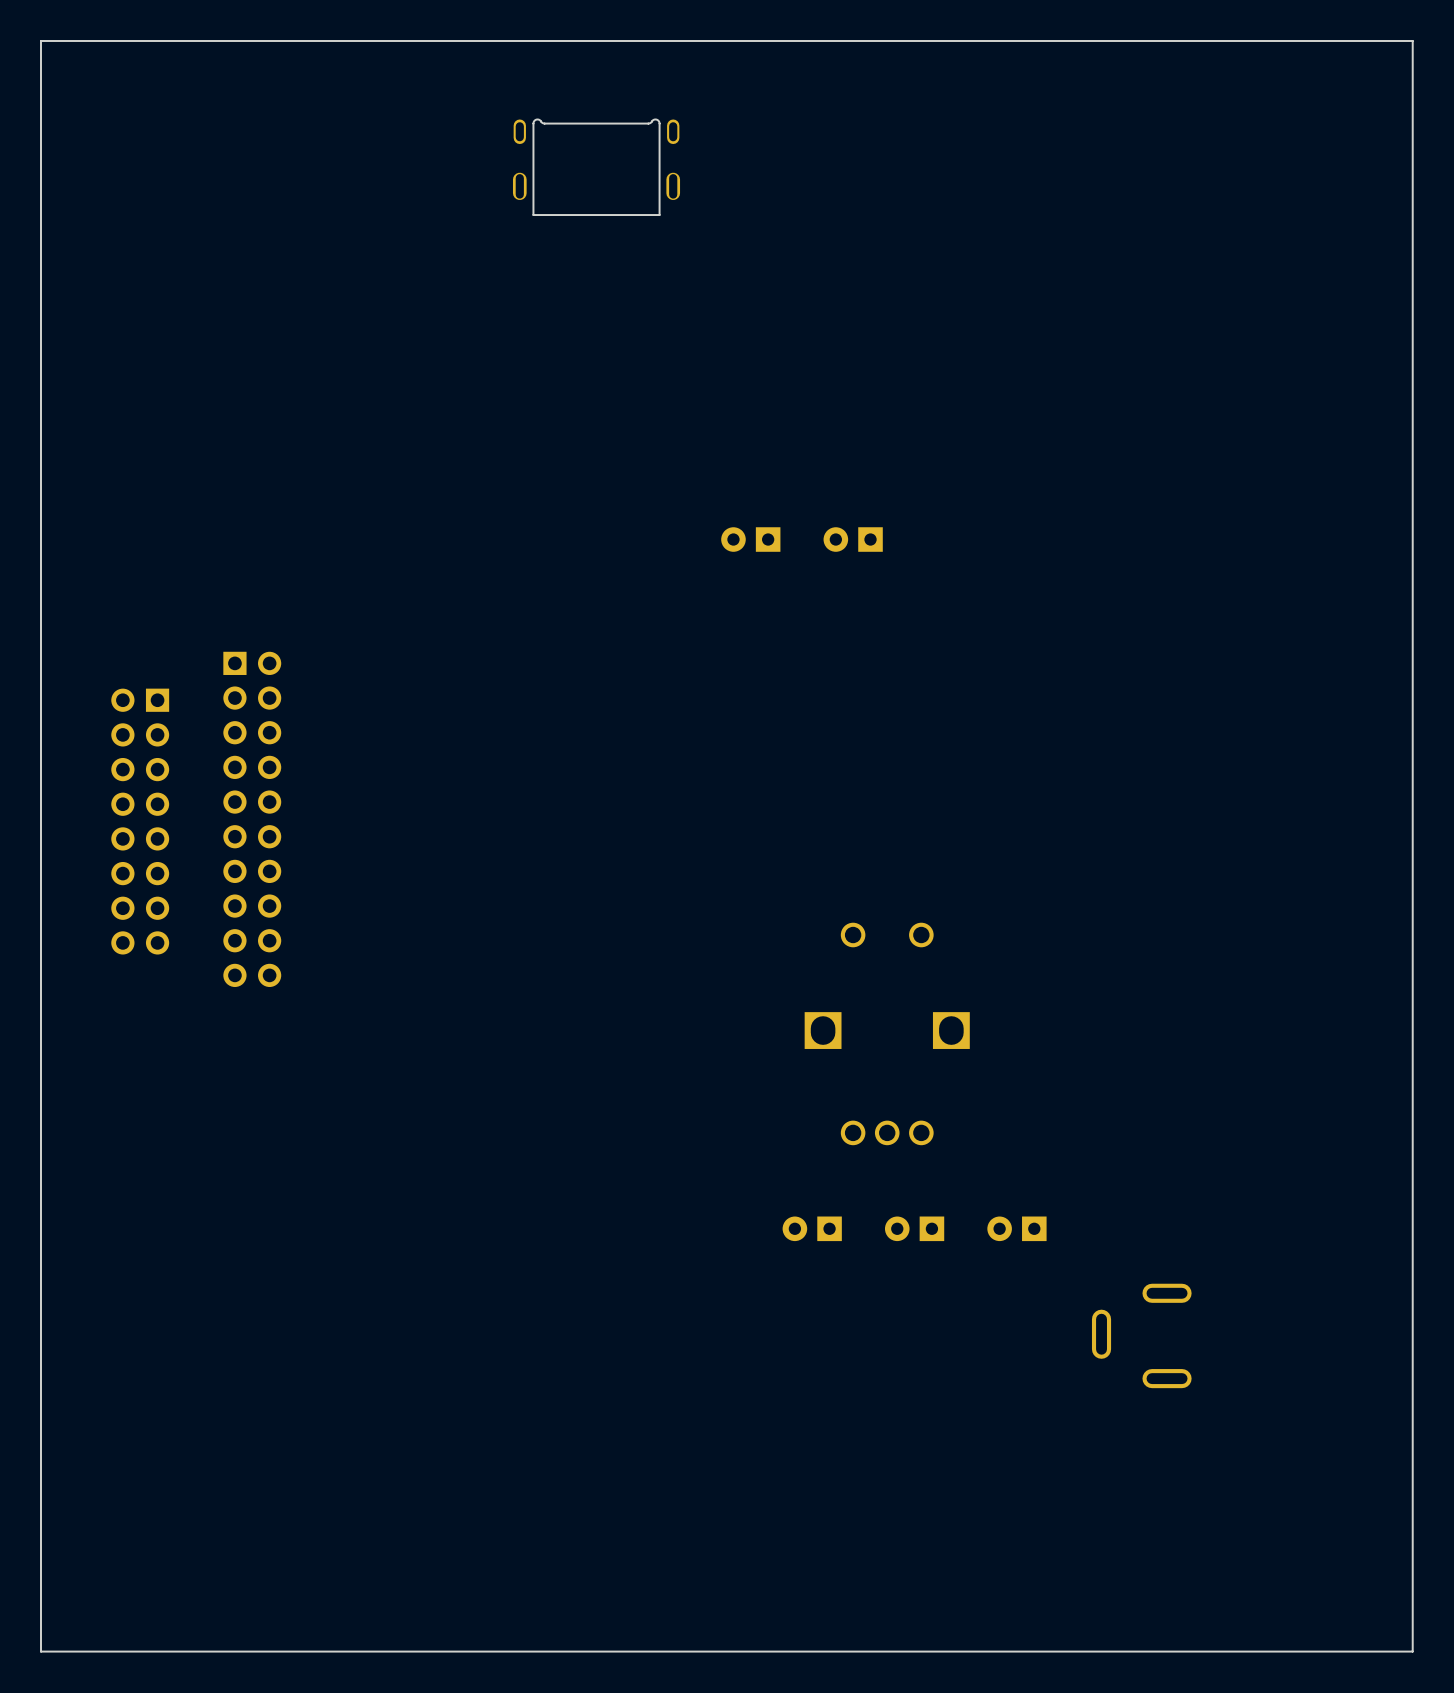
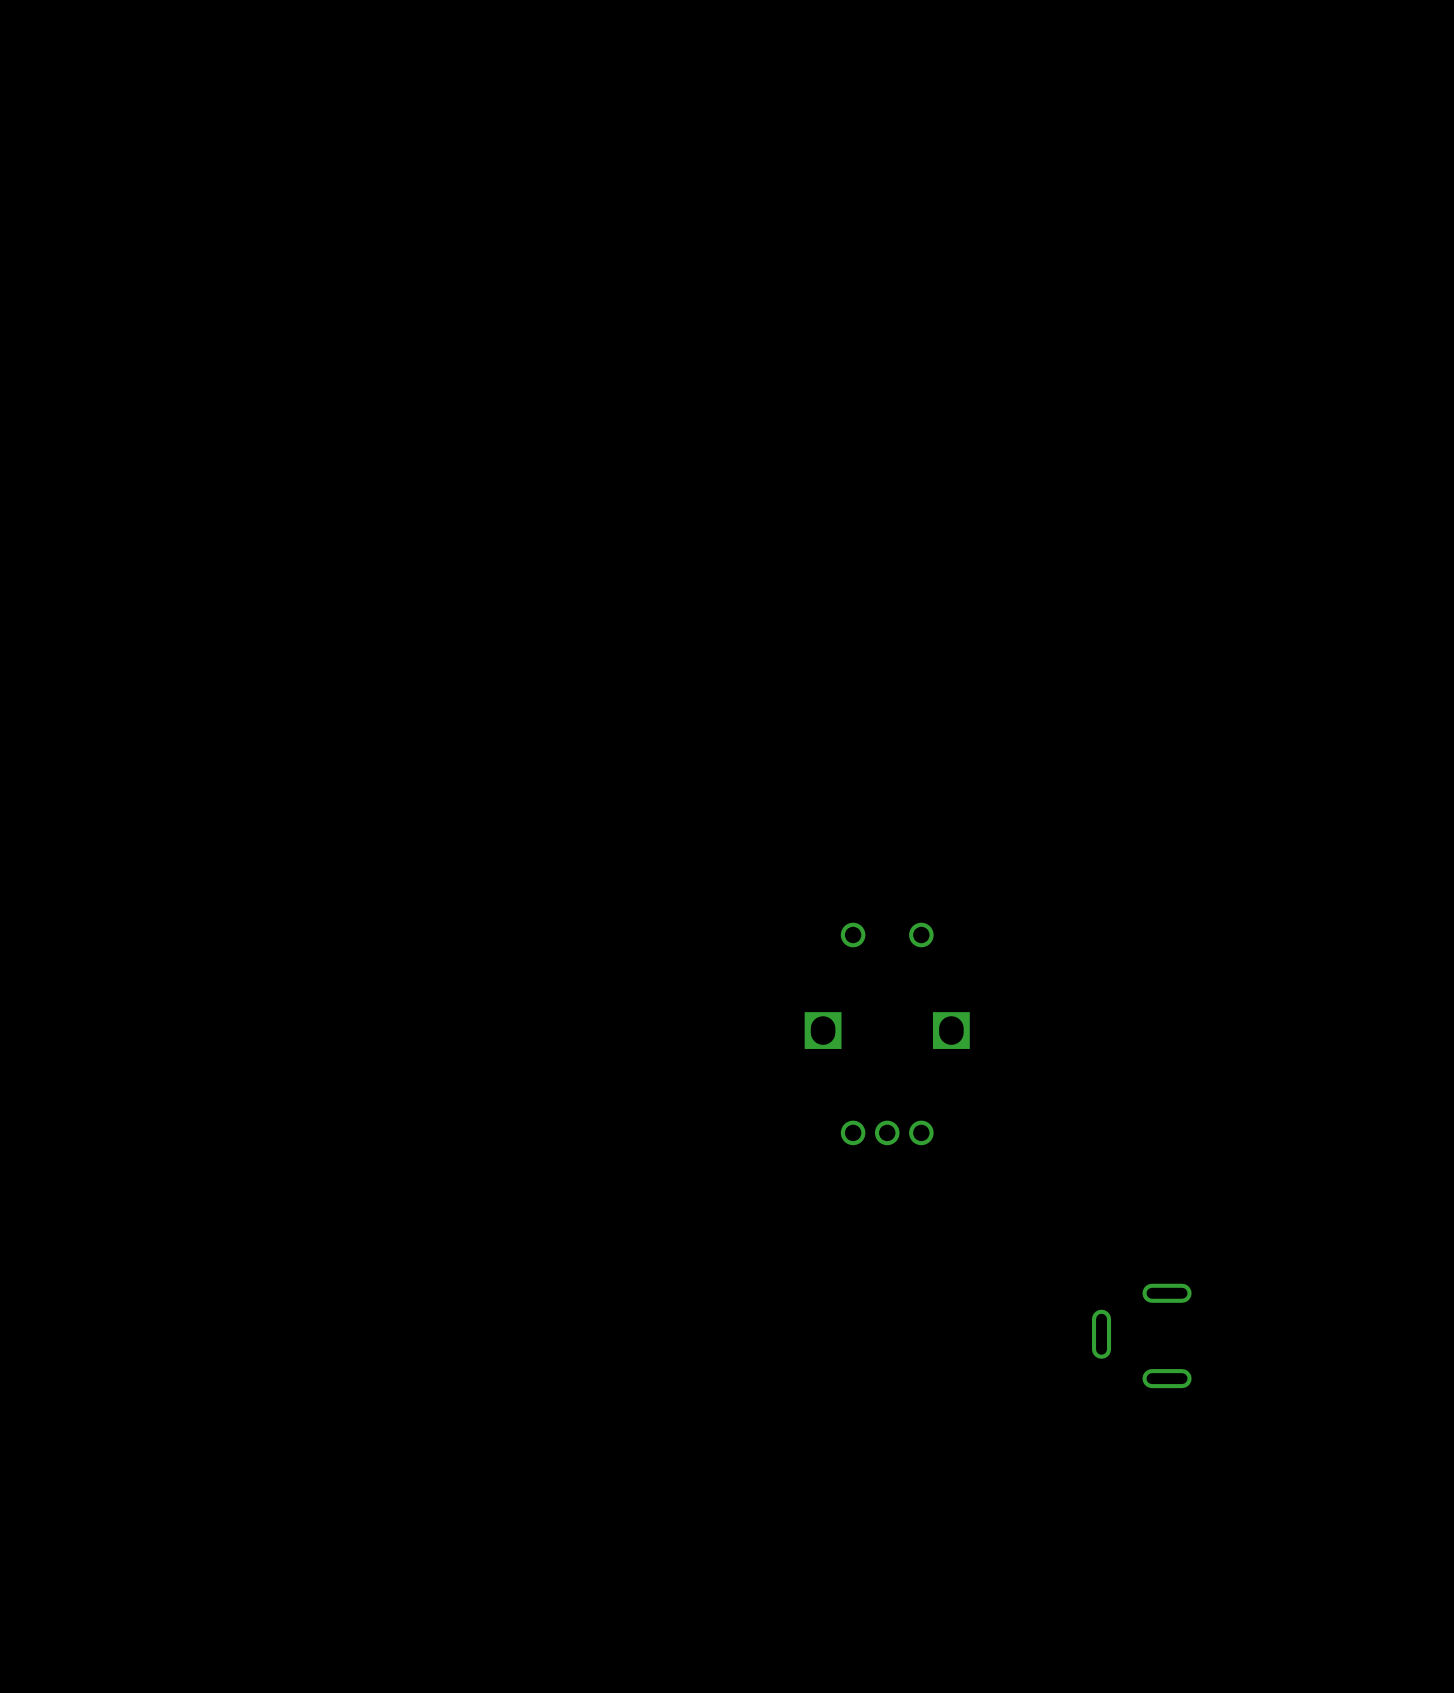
board edge: (1412, 40) (40, 40) (40, 1651) (1412, 1651) (1412, 40) -> none
part: (596, 167) -> none
part: (750, 539) -> none
part: (853, 539) -> none
part: (252, 819) -> none
part: (140, 821) -> none
part: (812, 1228) -> none
part: (914, 1228) -> none
part: (1016, 1228) -> none

